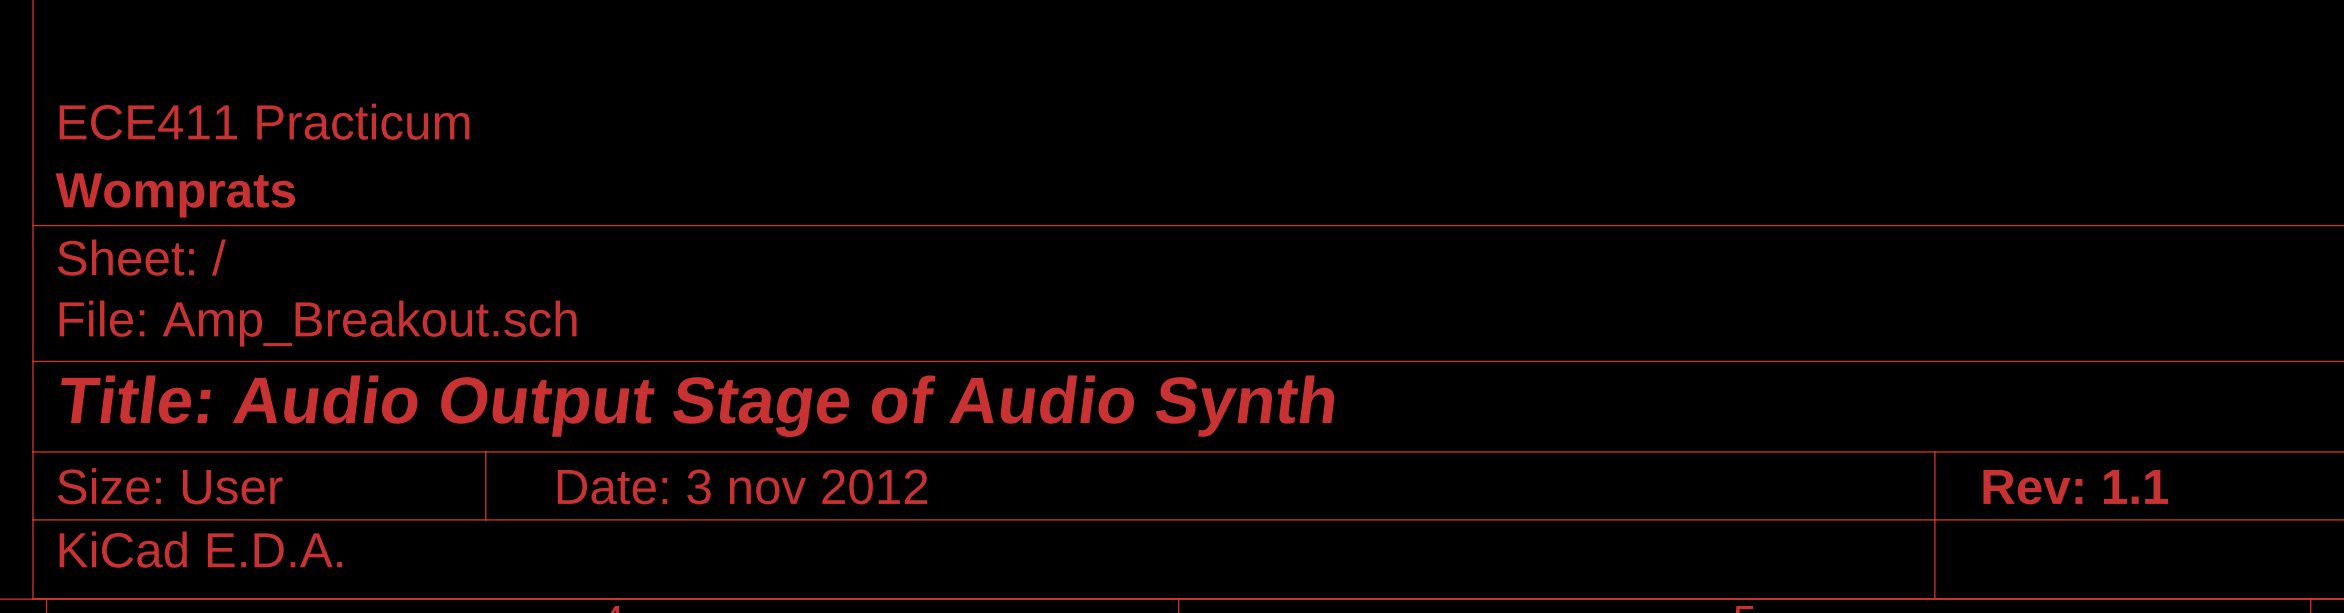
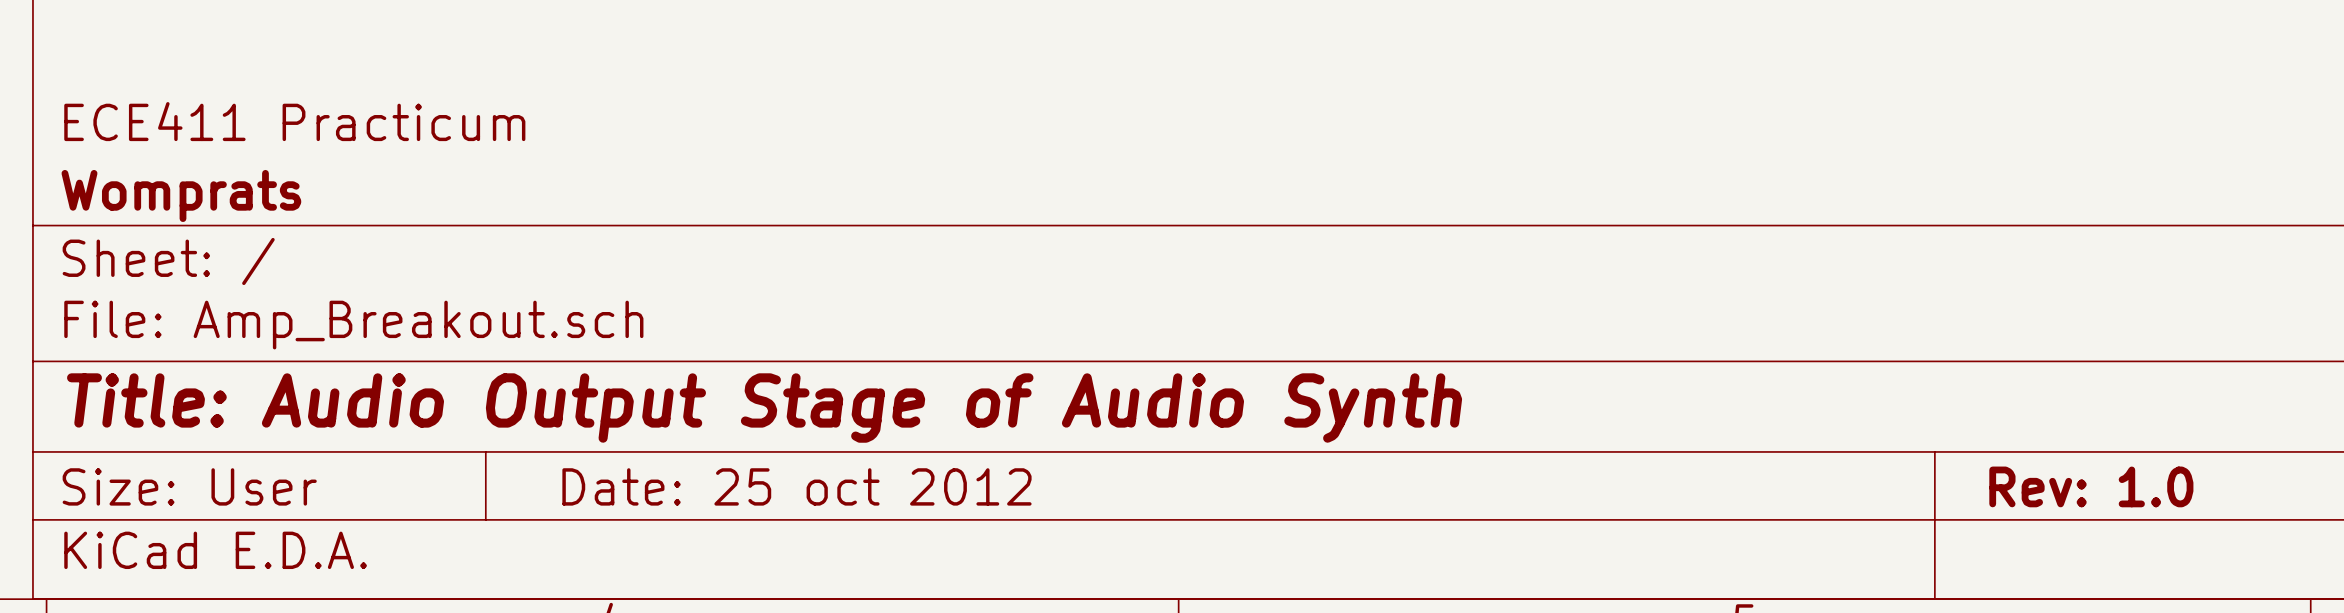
title block: Date: 3 nov 2012 (742, 486) -> Date: 25 oct 2012 (796, 486)
title block: Rev: 1.1 (2075, 487) -> Rev: 1.0 (2091, 486)

